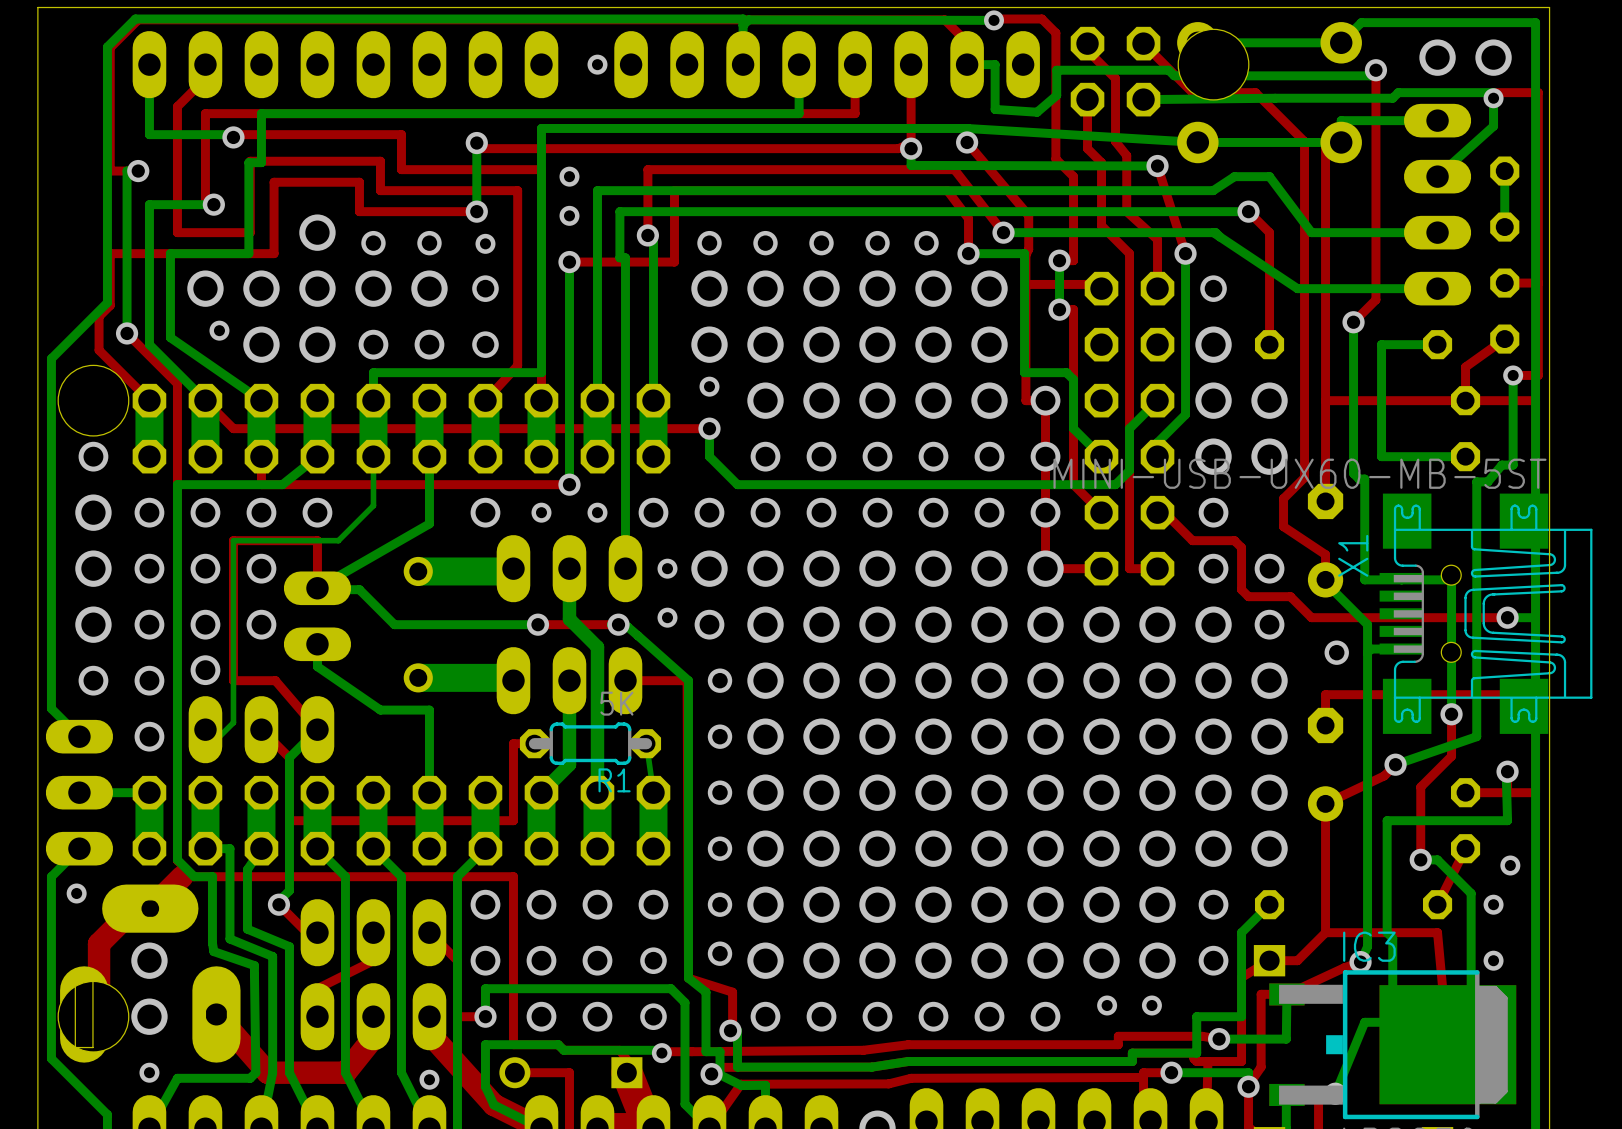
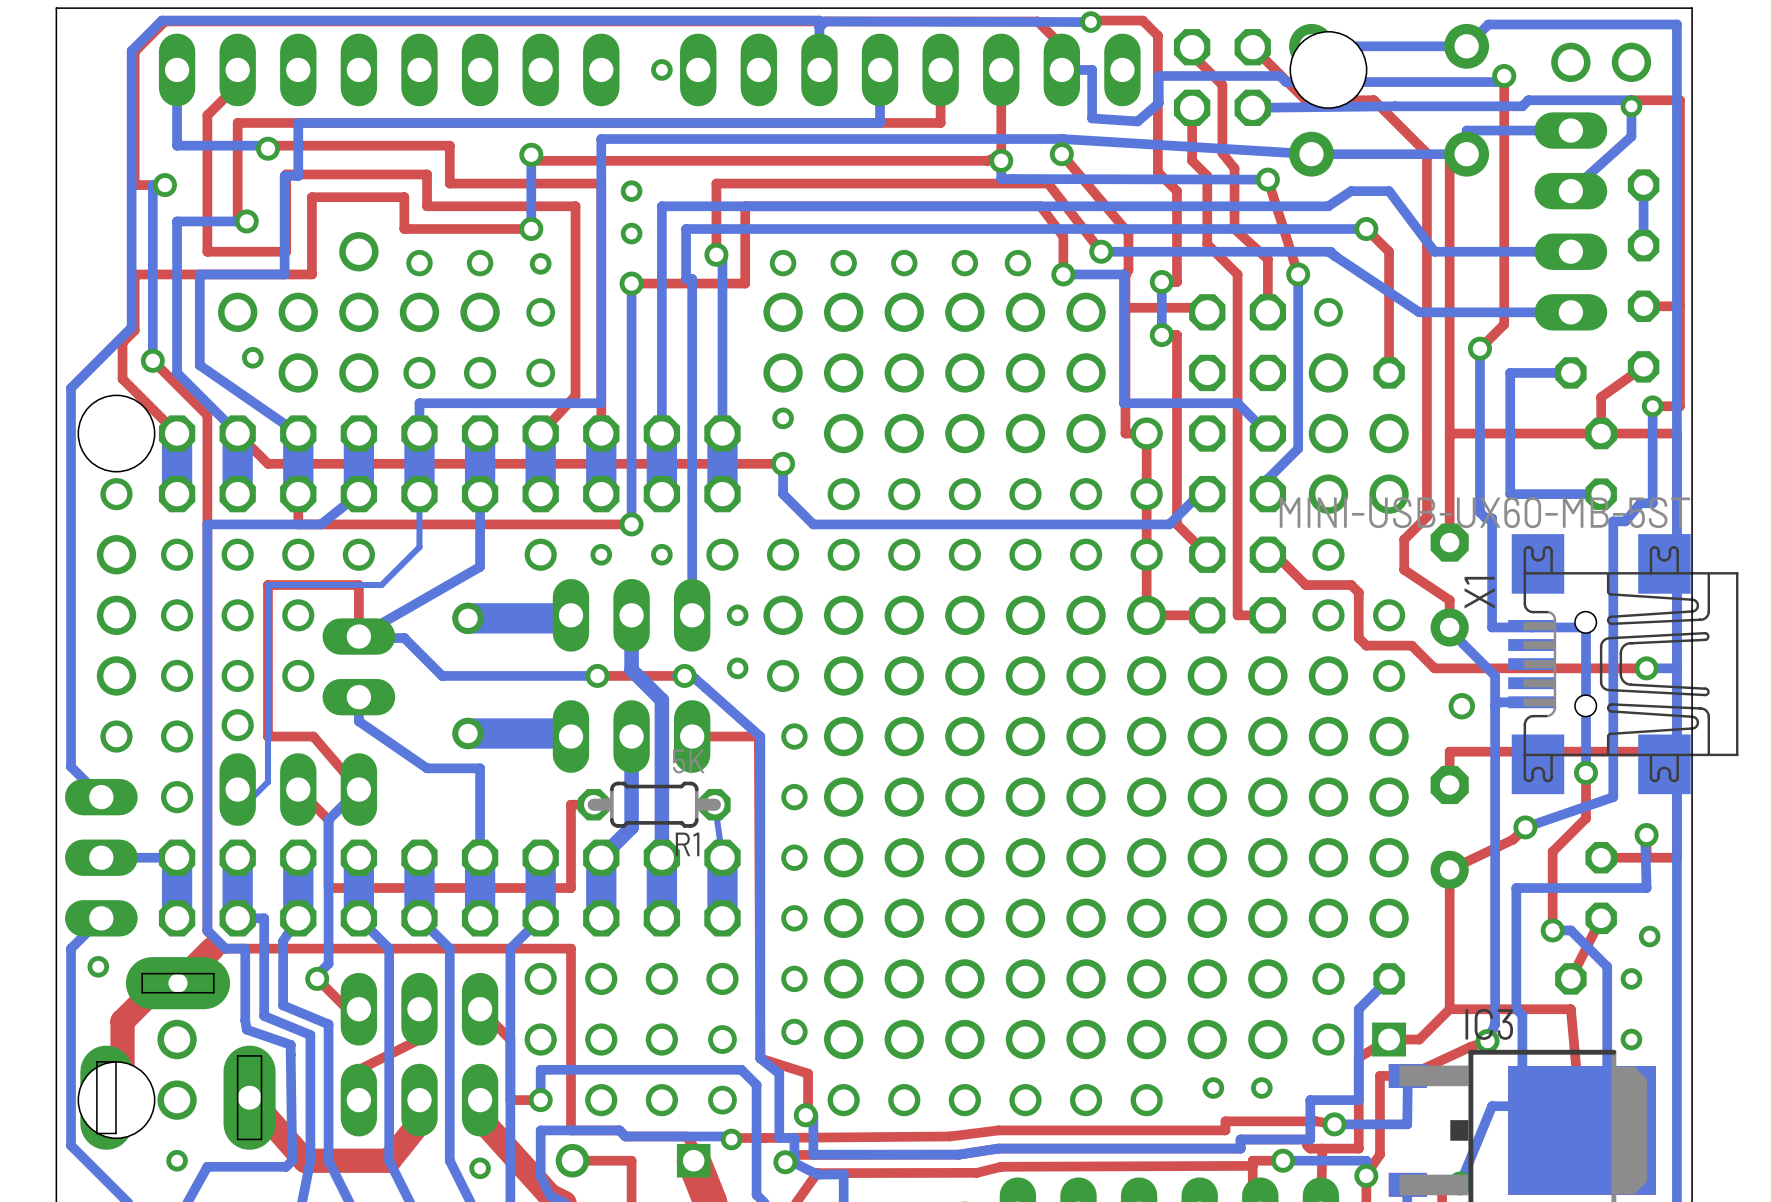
bottom track: (1066, 372) (1073, 379) (1073, 428) (1101, 456) -> (1169, 403) (1237, 403) (1267, 433)
bottom track: (1157, 400) (1129, 428) (1129, 470) (1115, 484) (1066, 484) -> (1207, 494) (1199, 494) (1169, 524)

